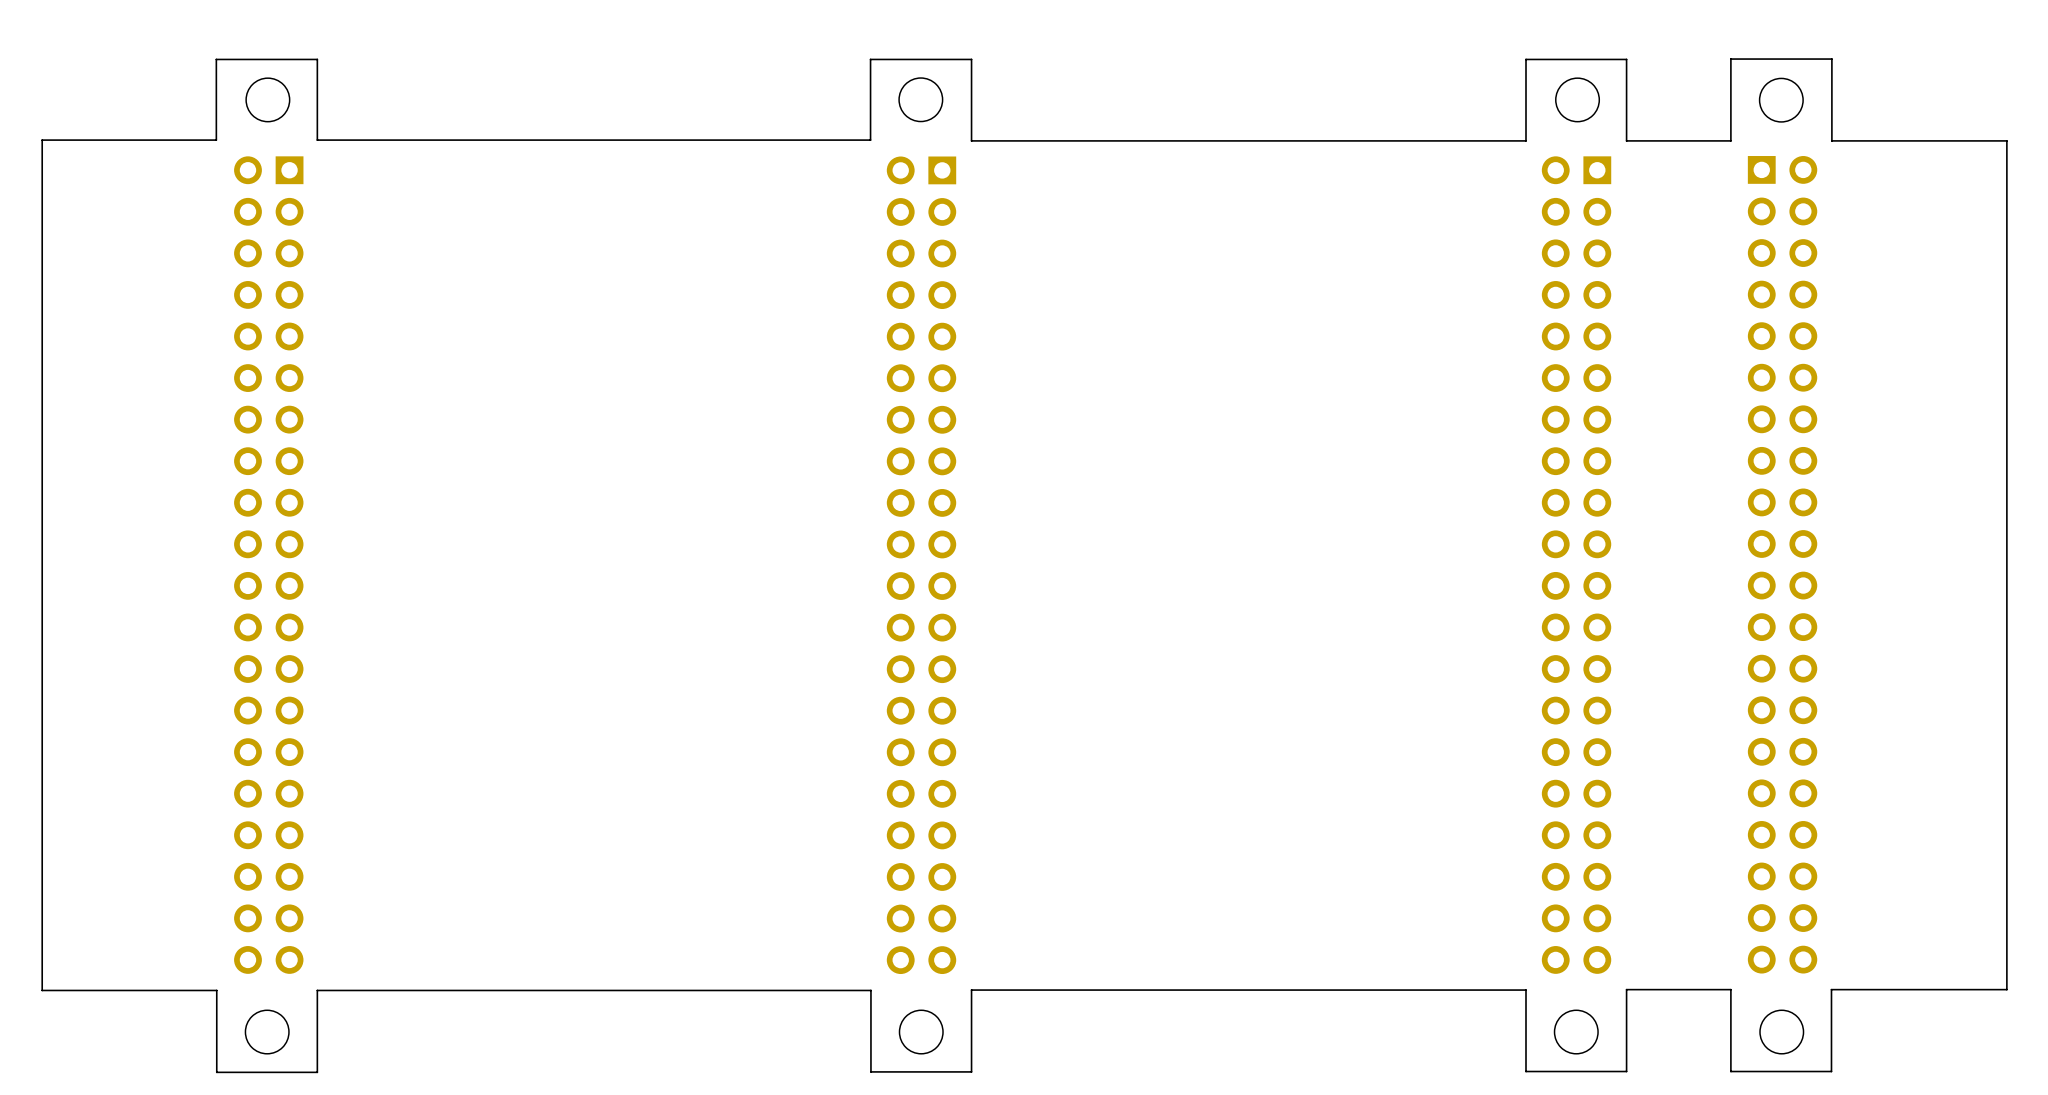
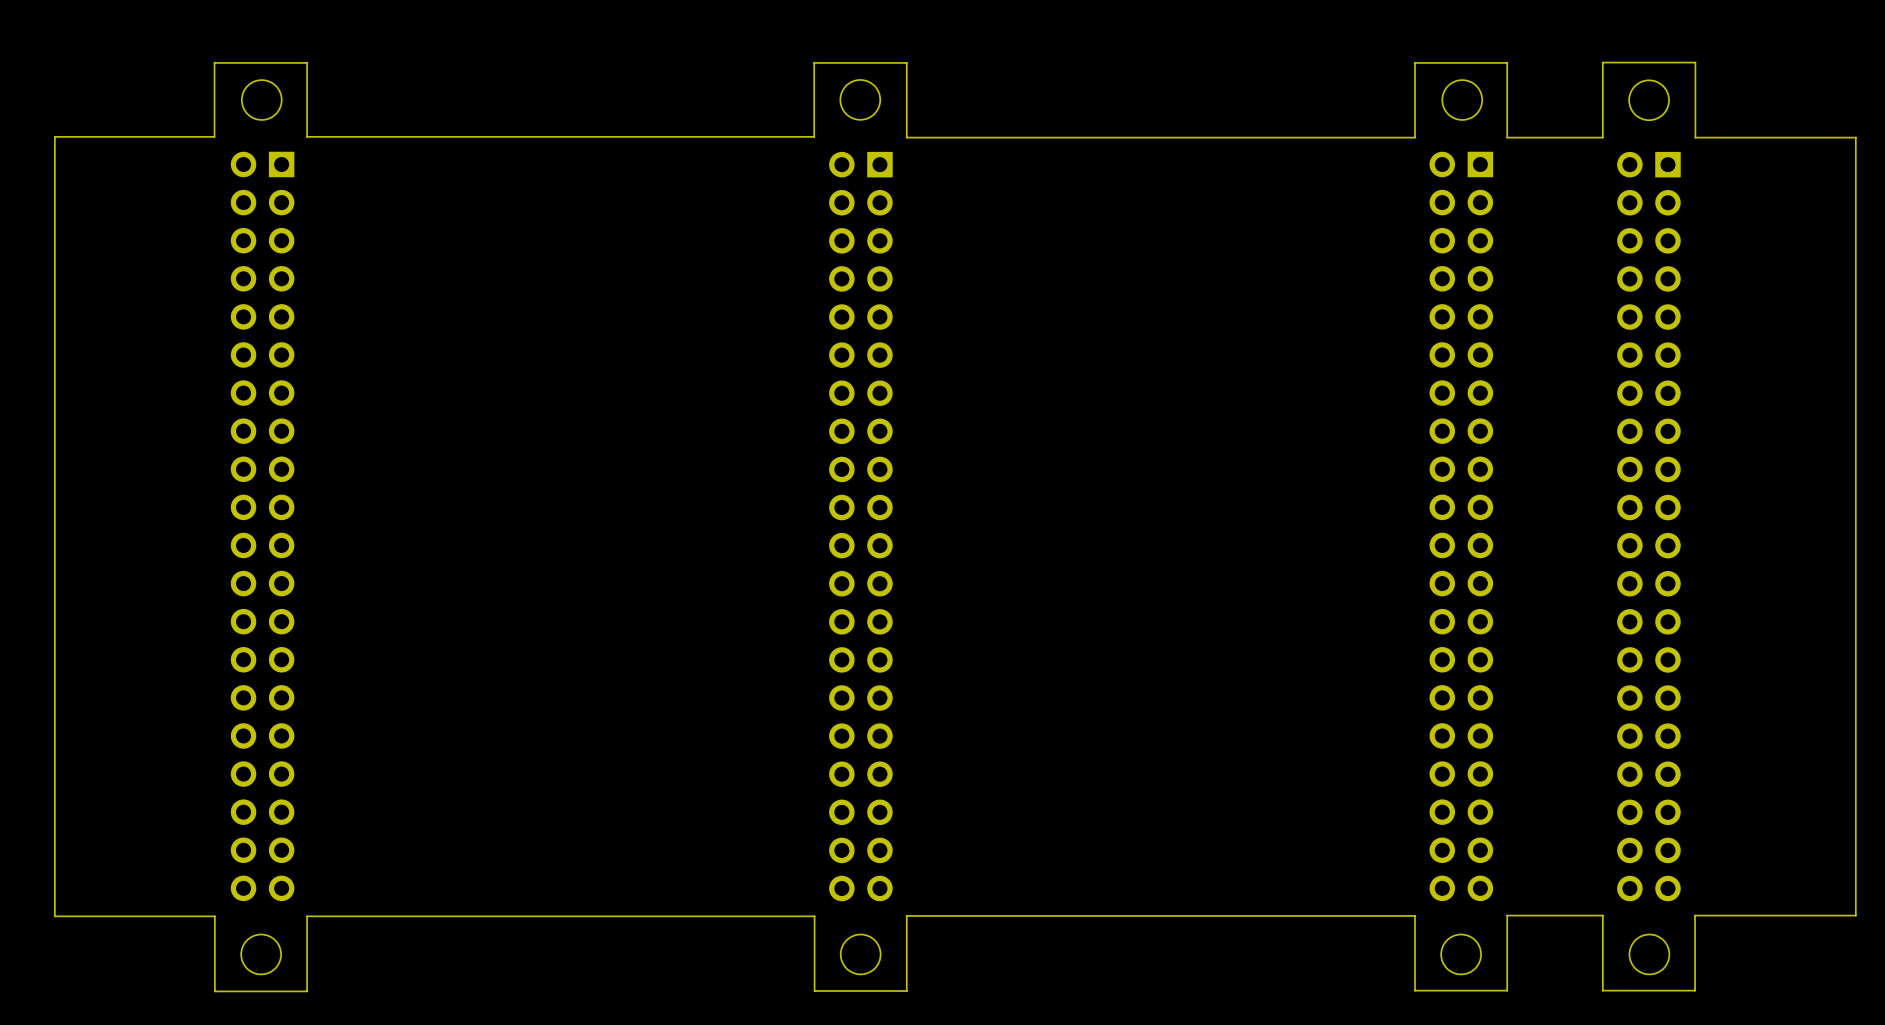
part footprint: [1747, 156, 1818, 974] -> [1617, 151, 1681, 902]

